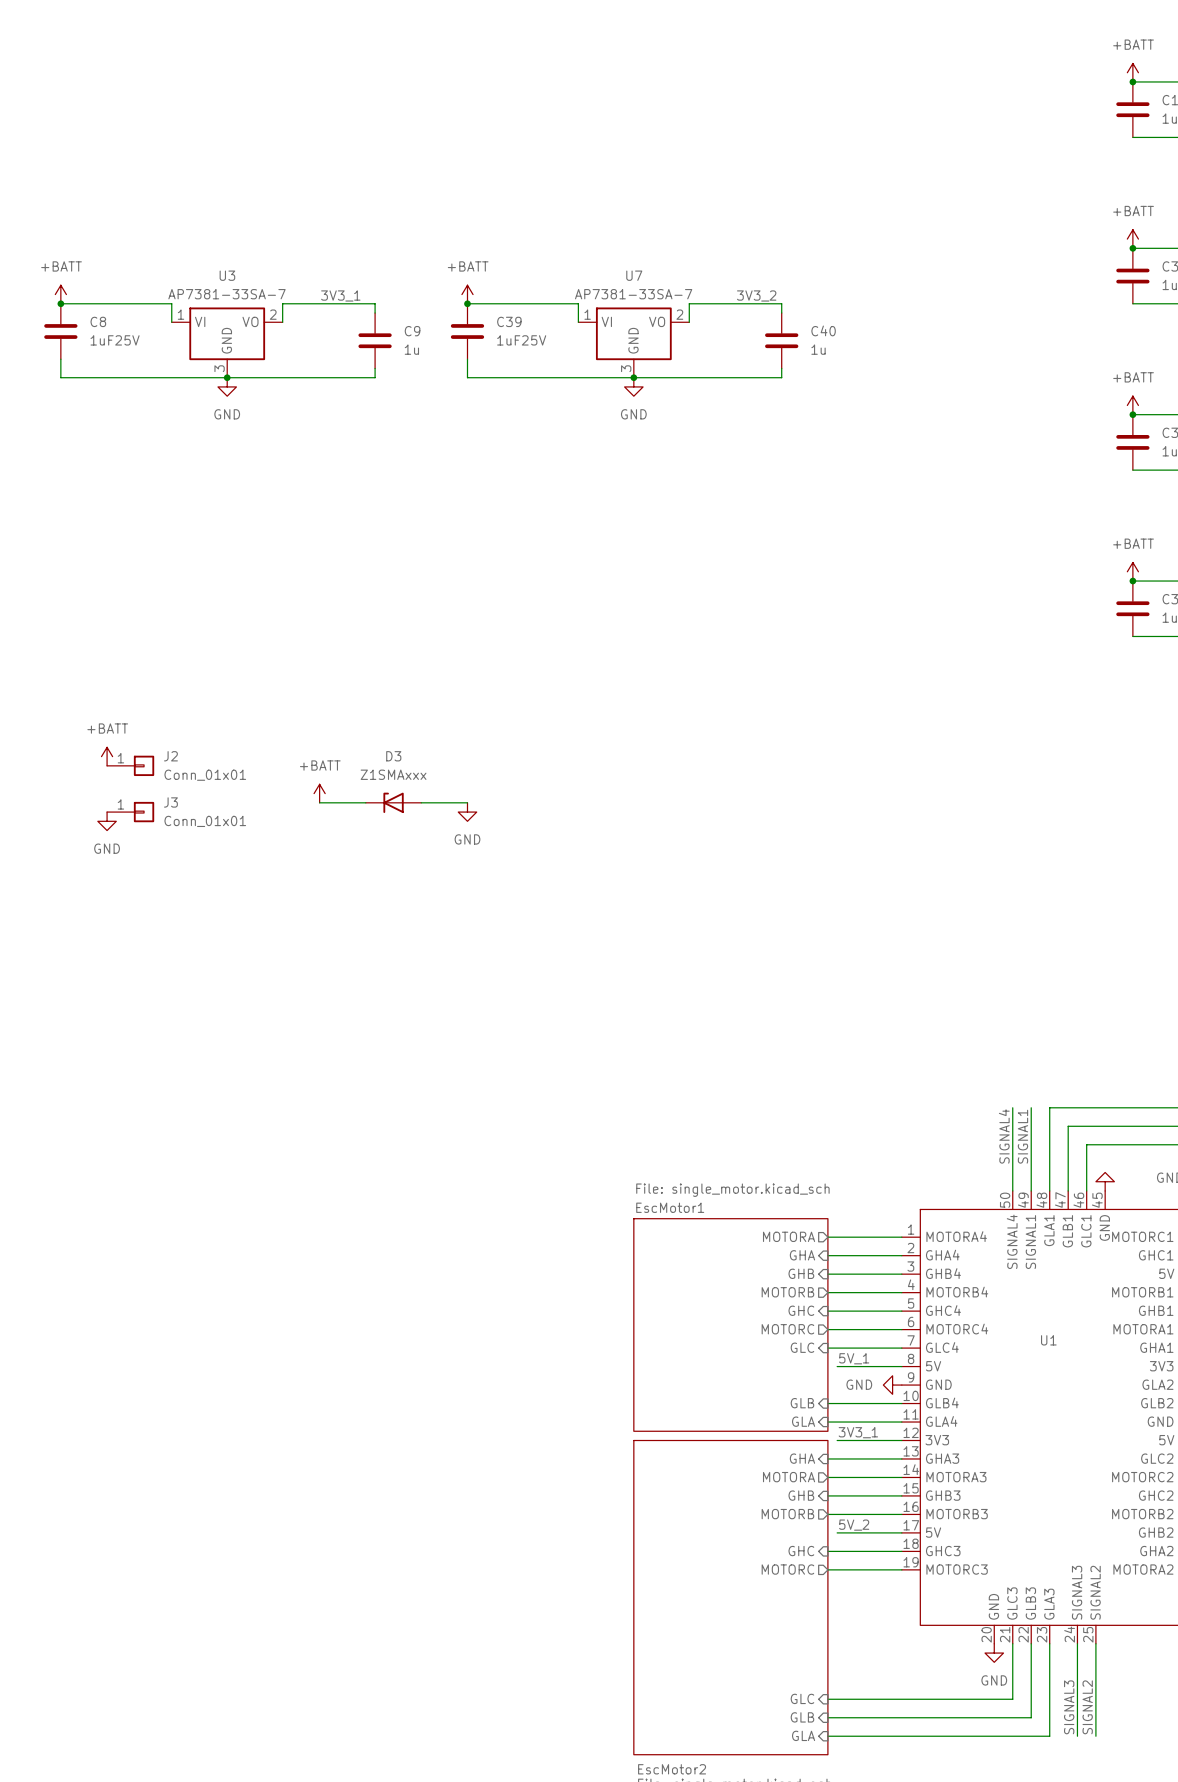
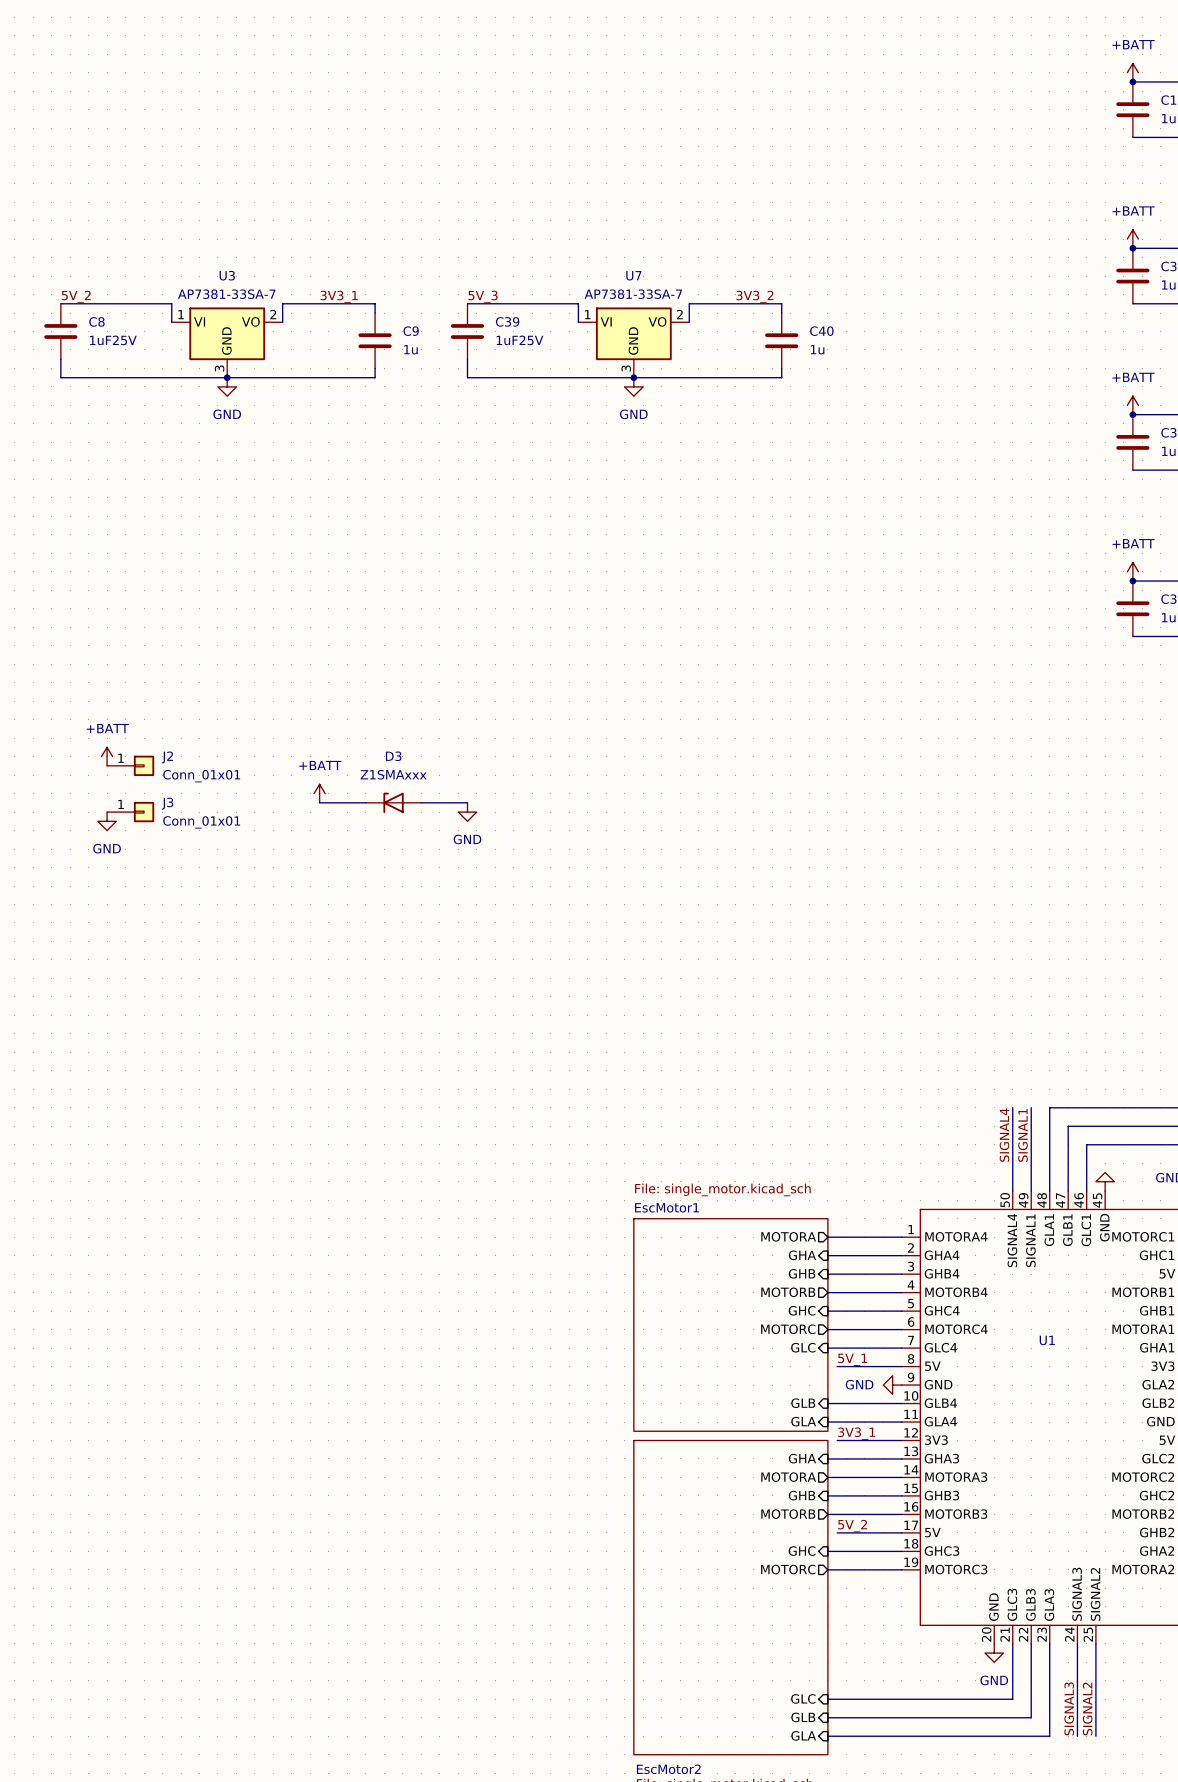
power symbol: +BATT (60, 294) -> none
power symbol: +BATT (467, 294) -> none
label: none -> 5V_2 (76, 296)
label: none -> 5V_3 (483, 296)
junction: (60, 303) -> none
junction: (467, 303) -> none

